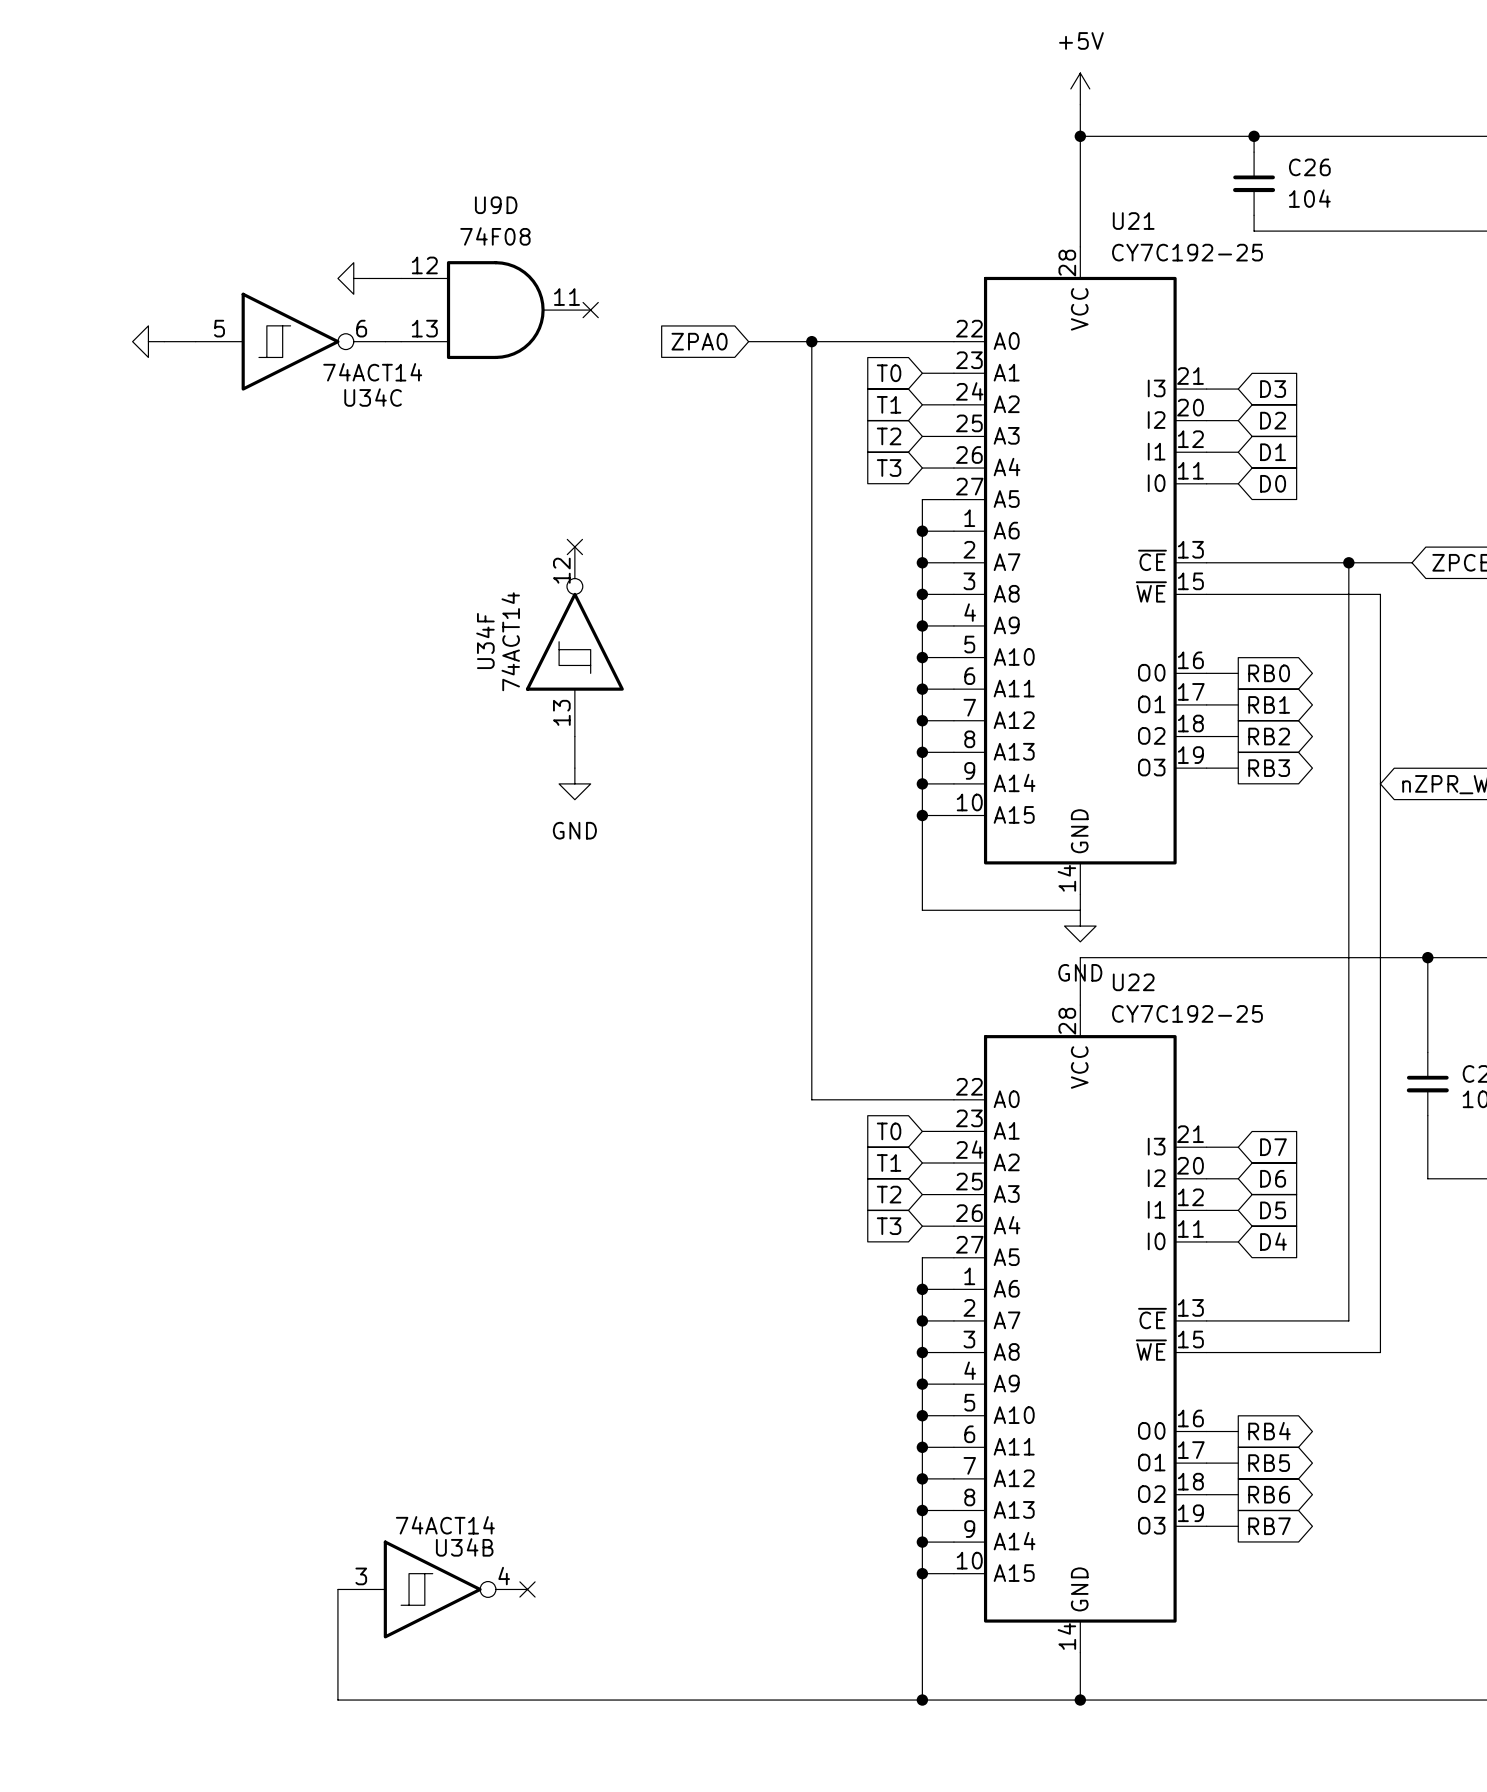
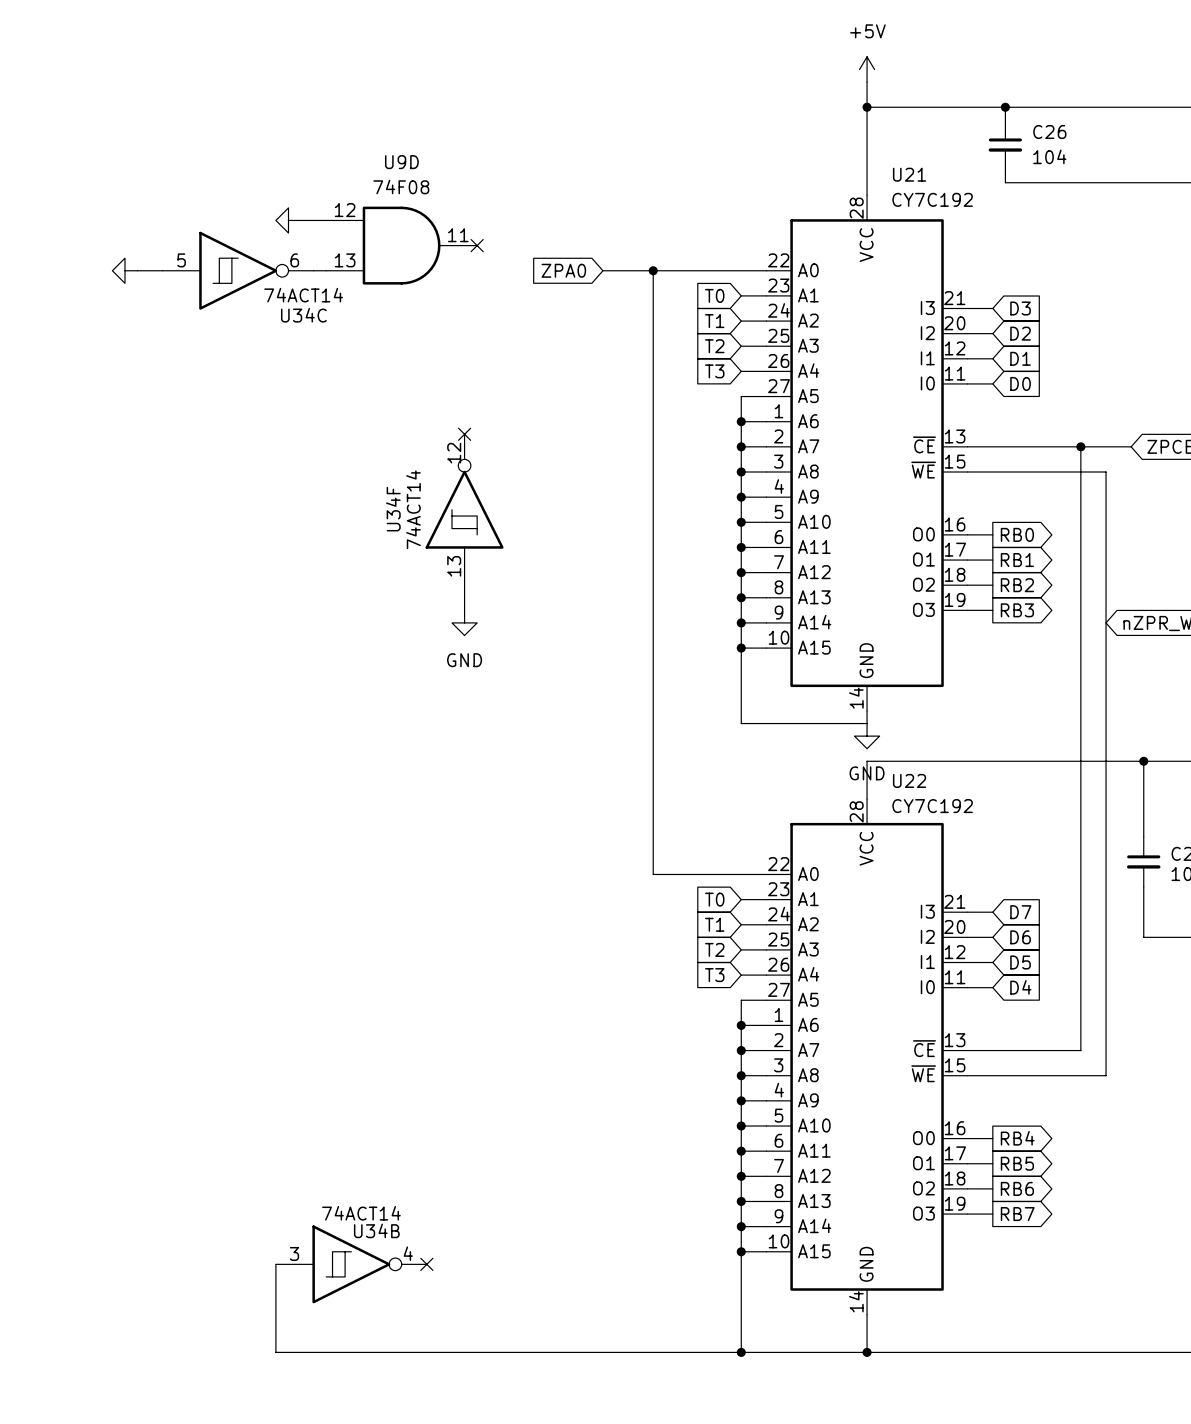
U21 value: CY7C192-25 (1187, 252) -> CY7C192 (932, 199)
U22 value: CY7C192-25 (1187, 1013) -> CY7C192 (932, 806)

